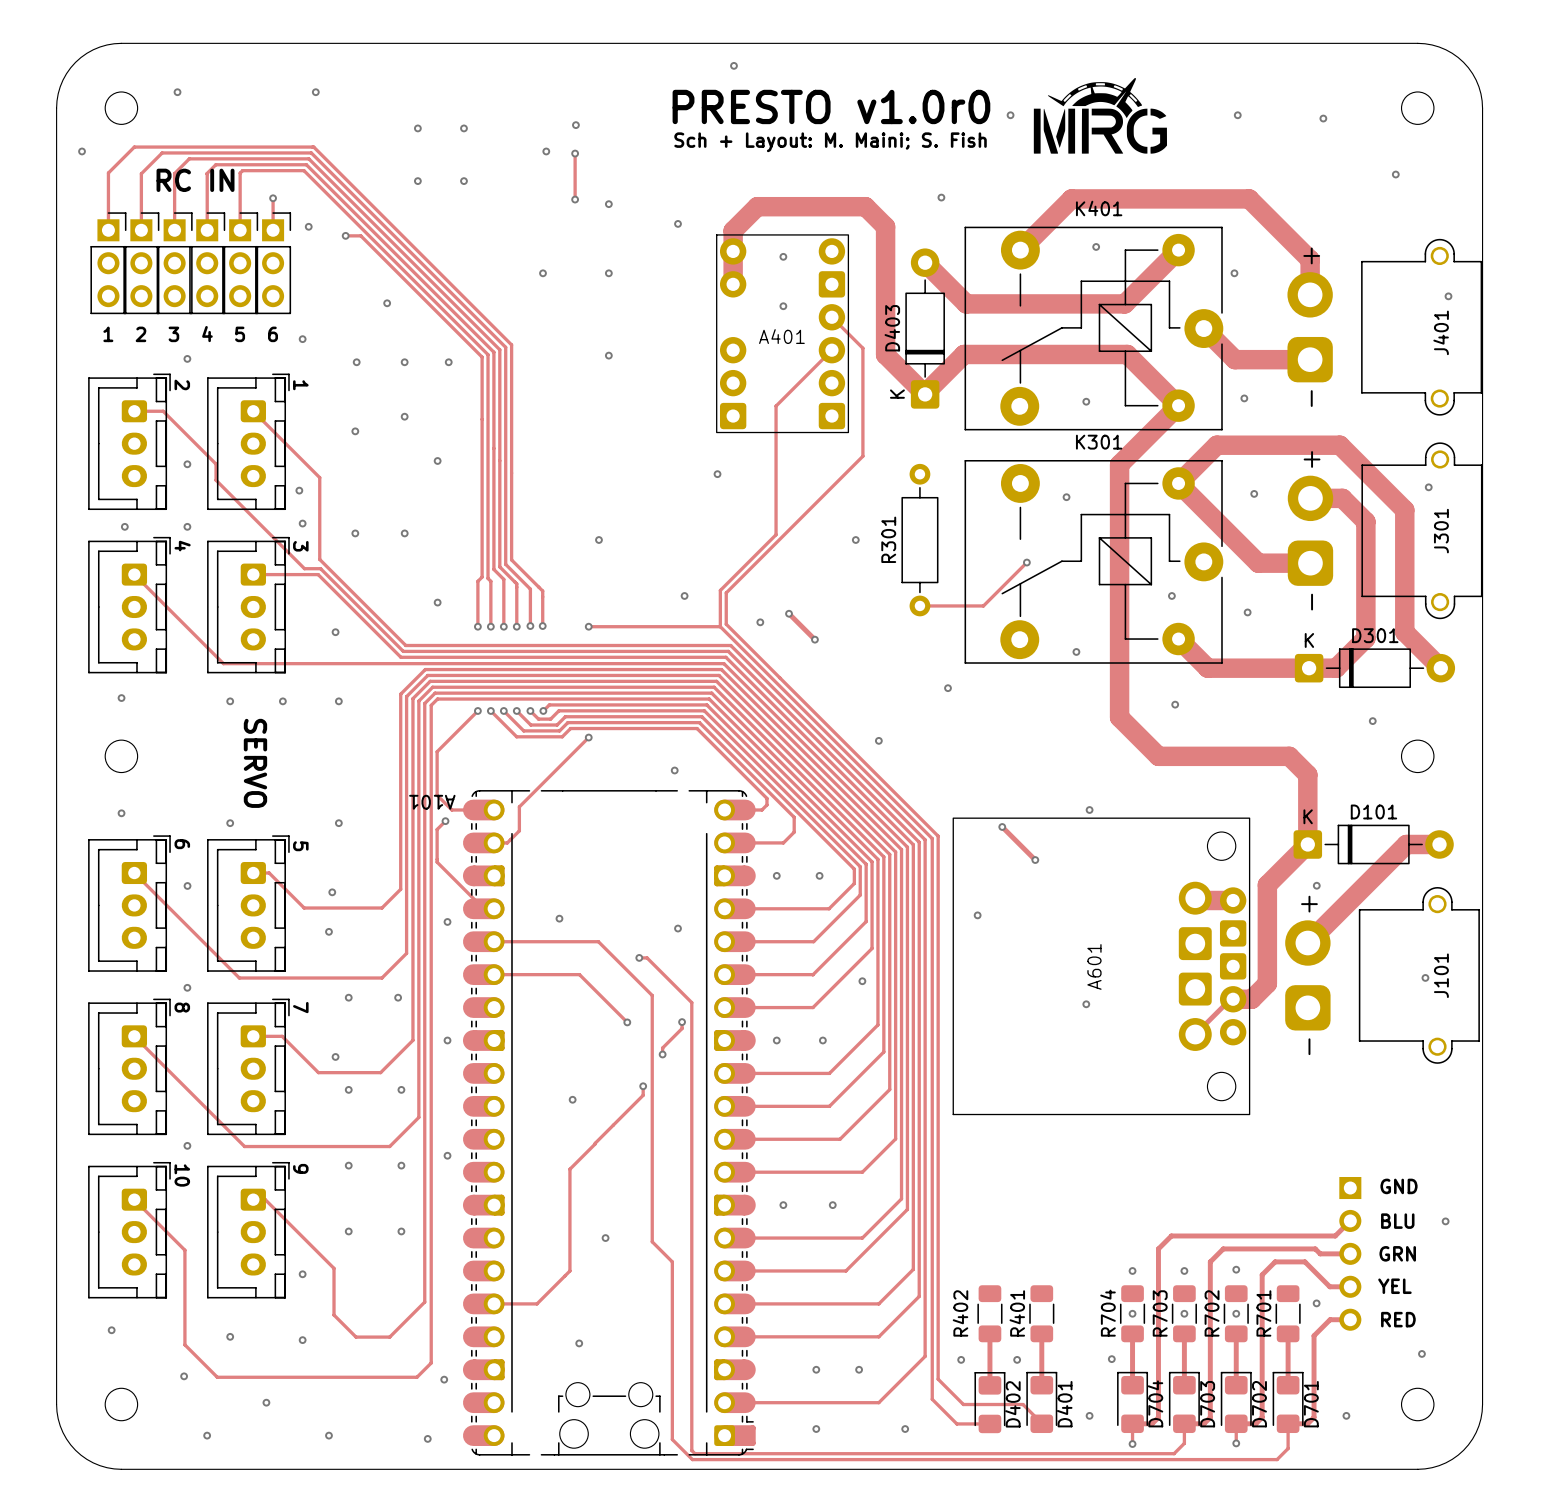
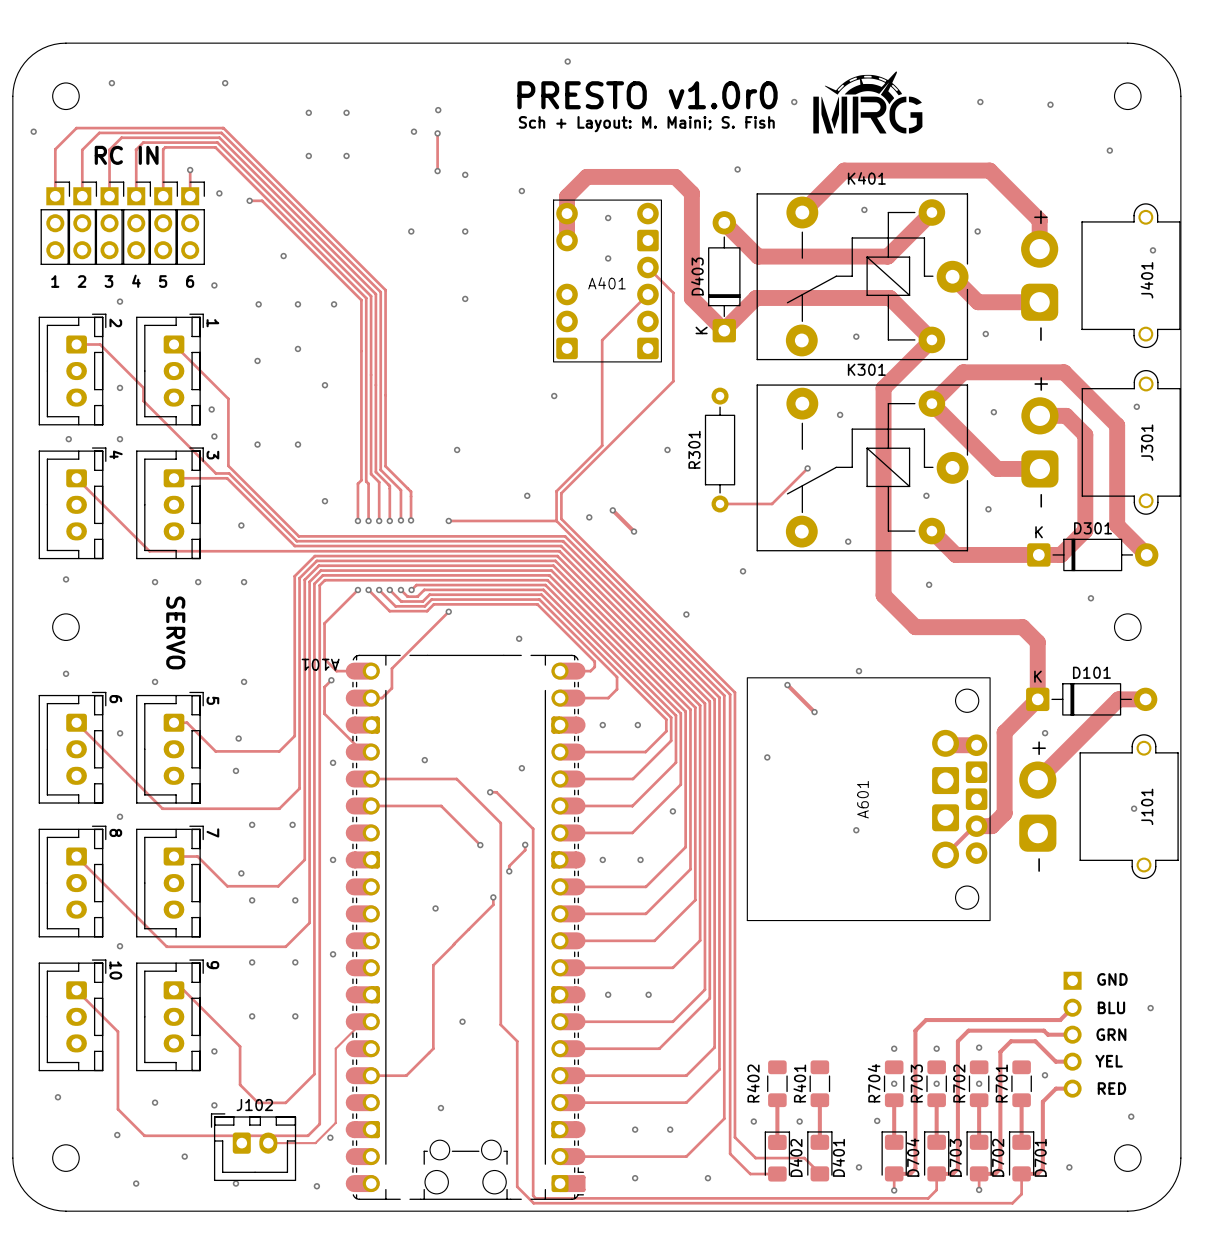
track: none -> (362, 1021) (335, 1048) (335, 1122) (315, 1143) (268, 1143)
J102: none -> (253, 1147)

